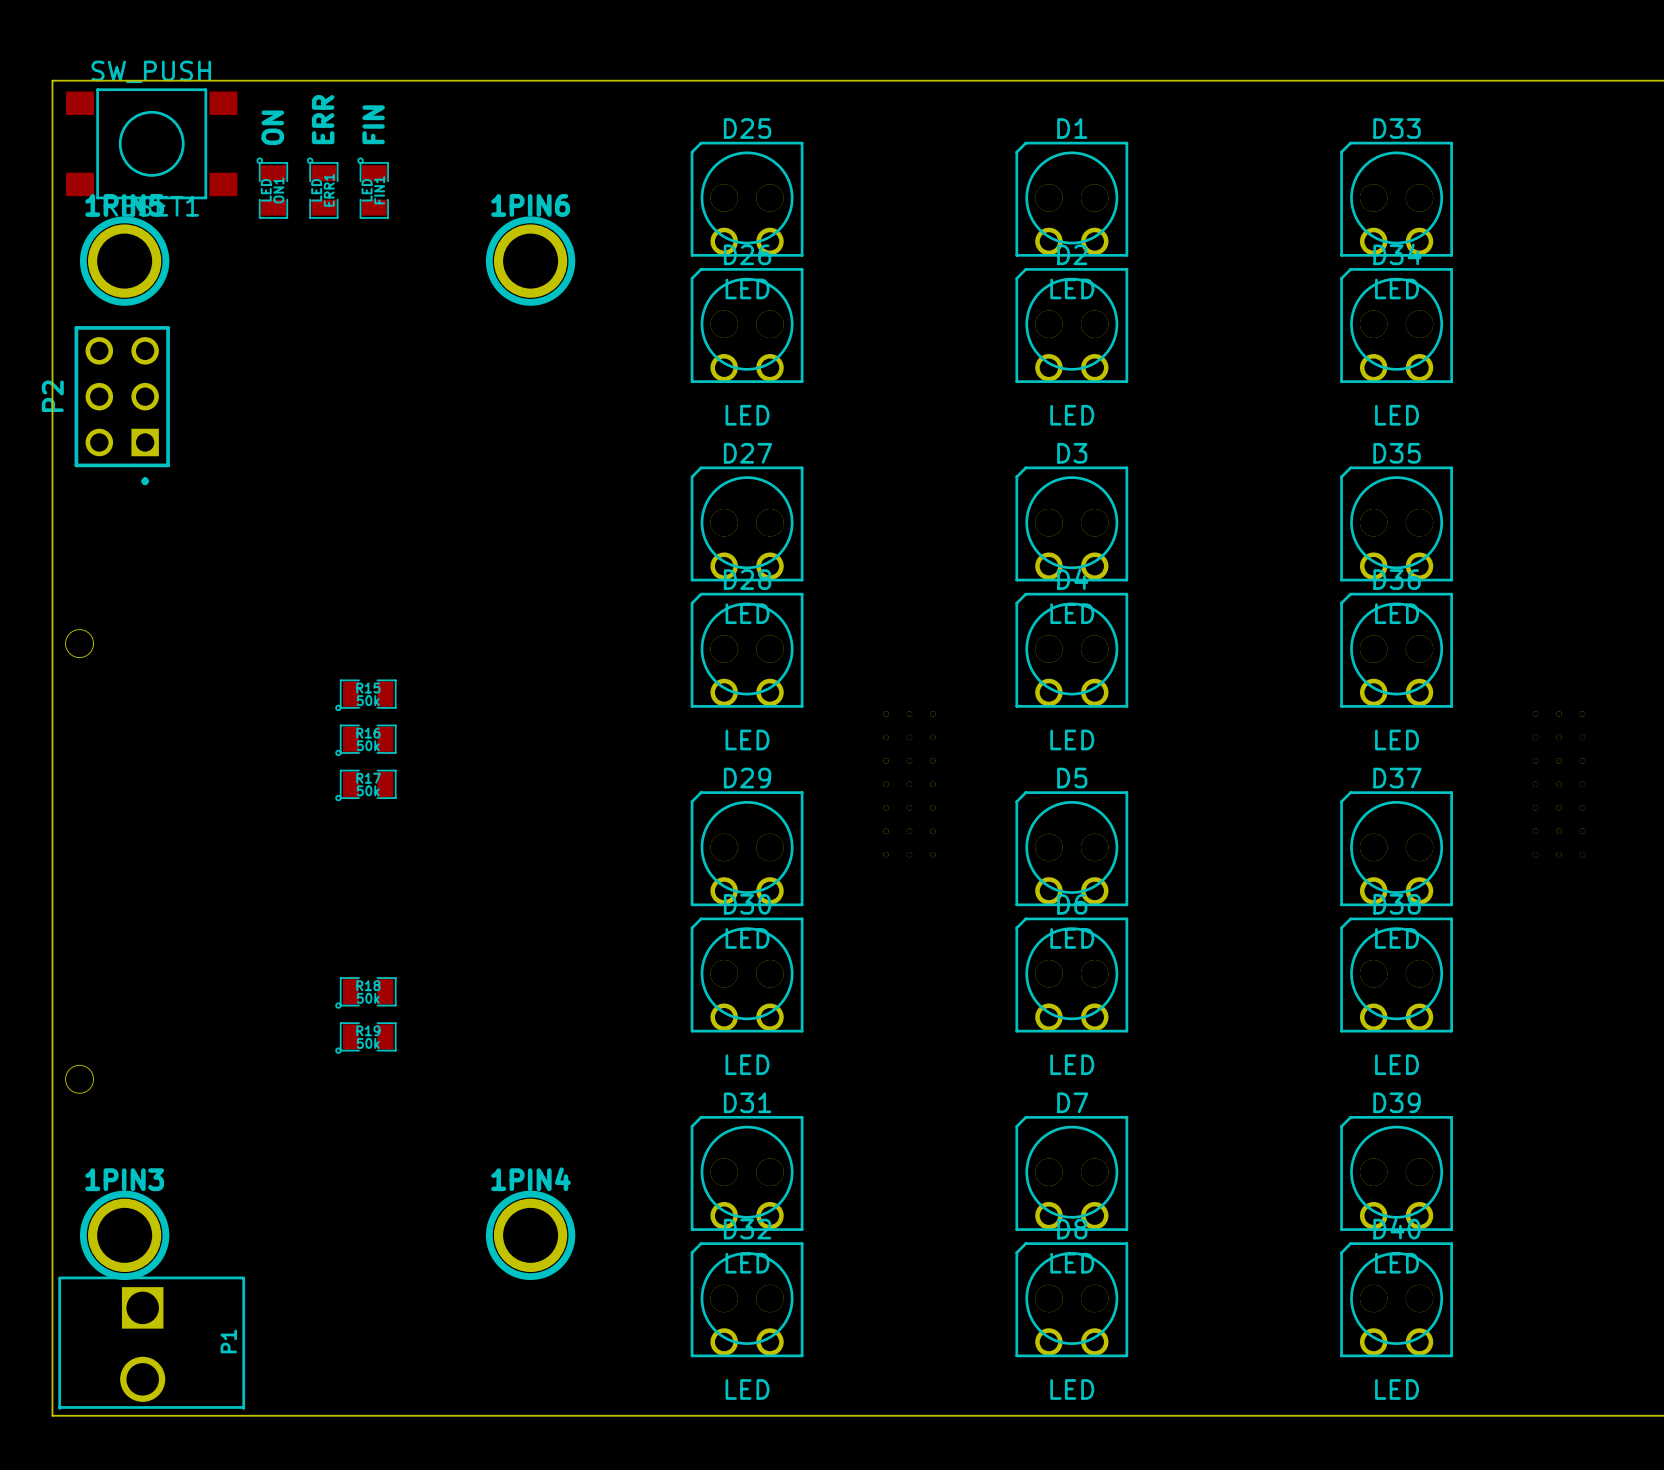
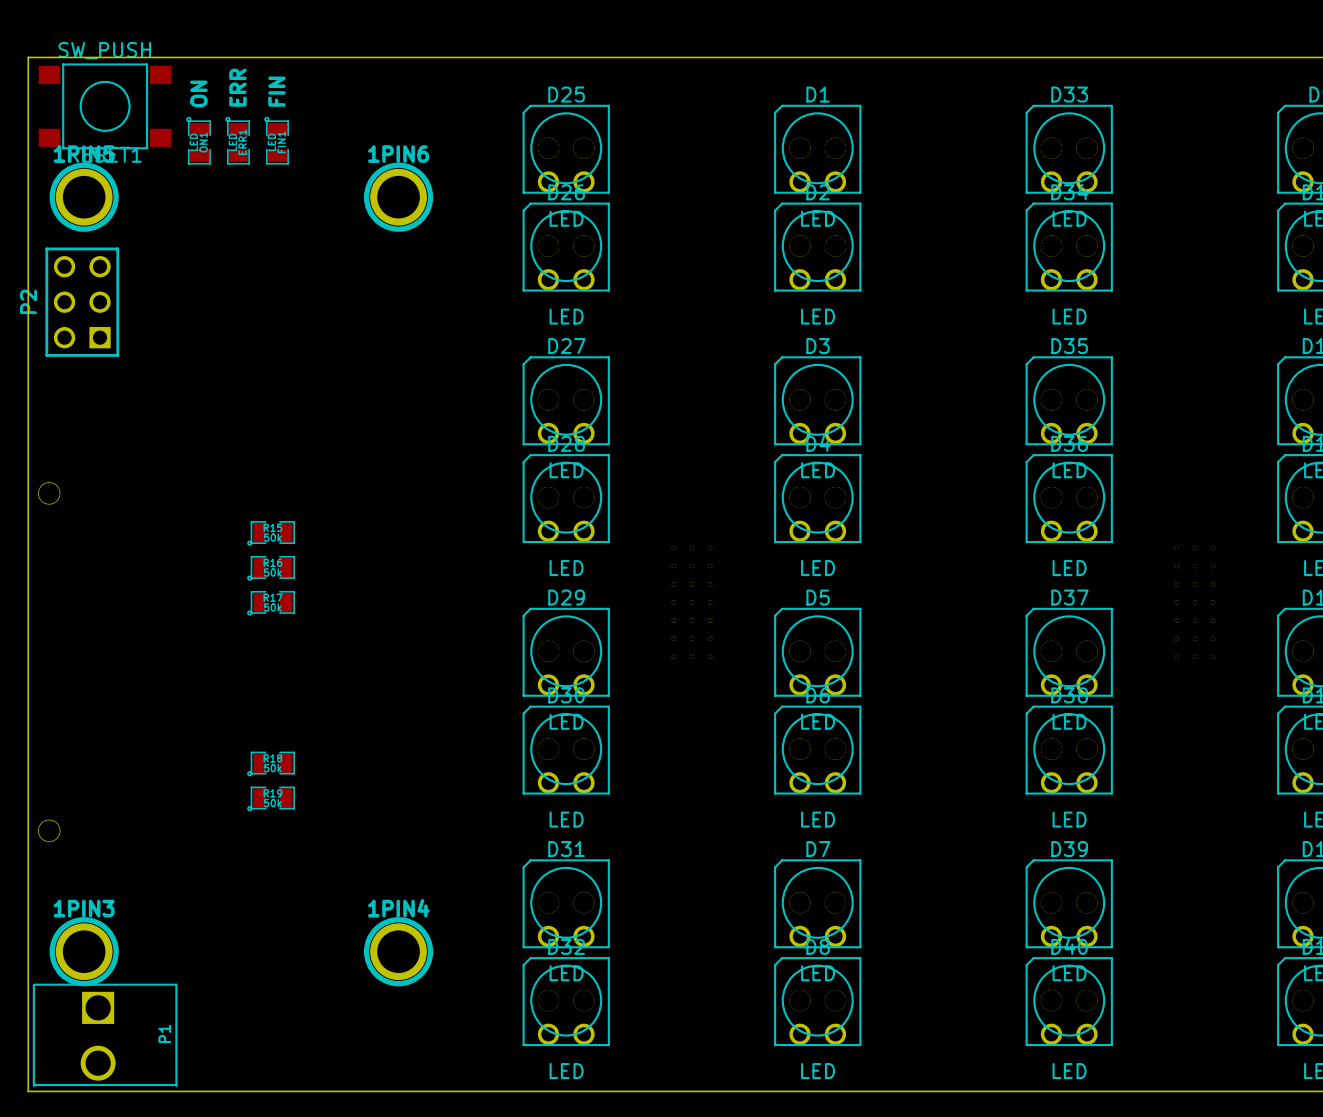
text: . (145, 481) -> none

